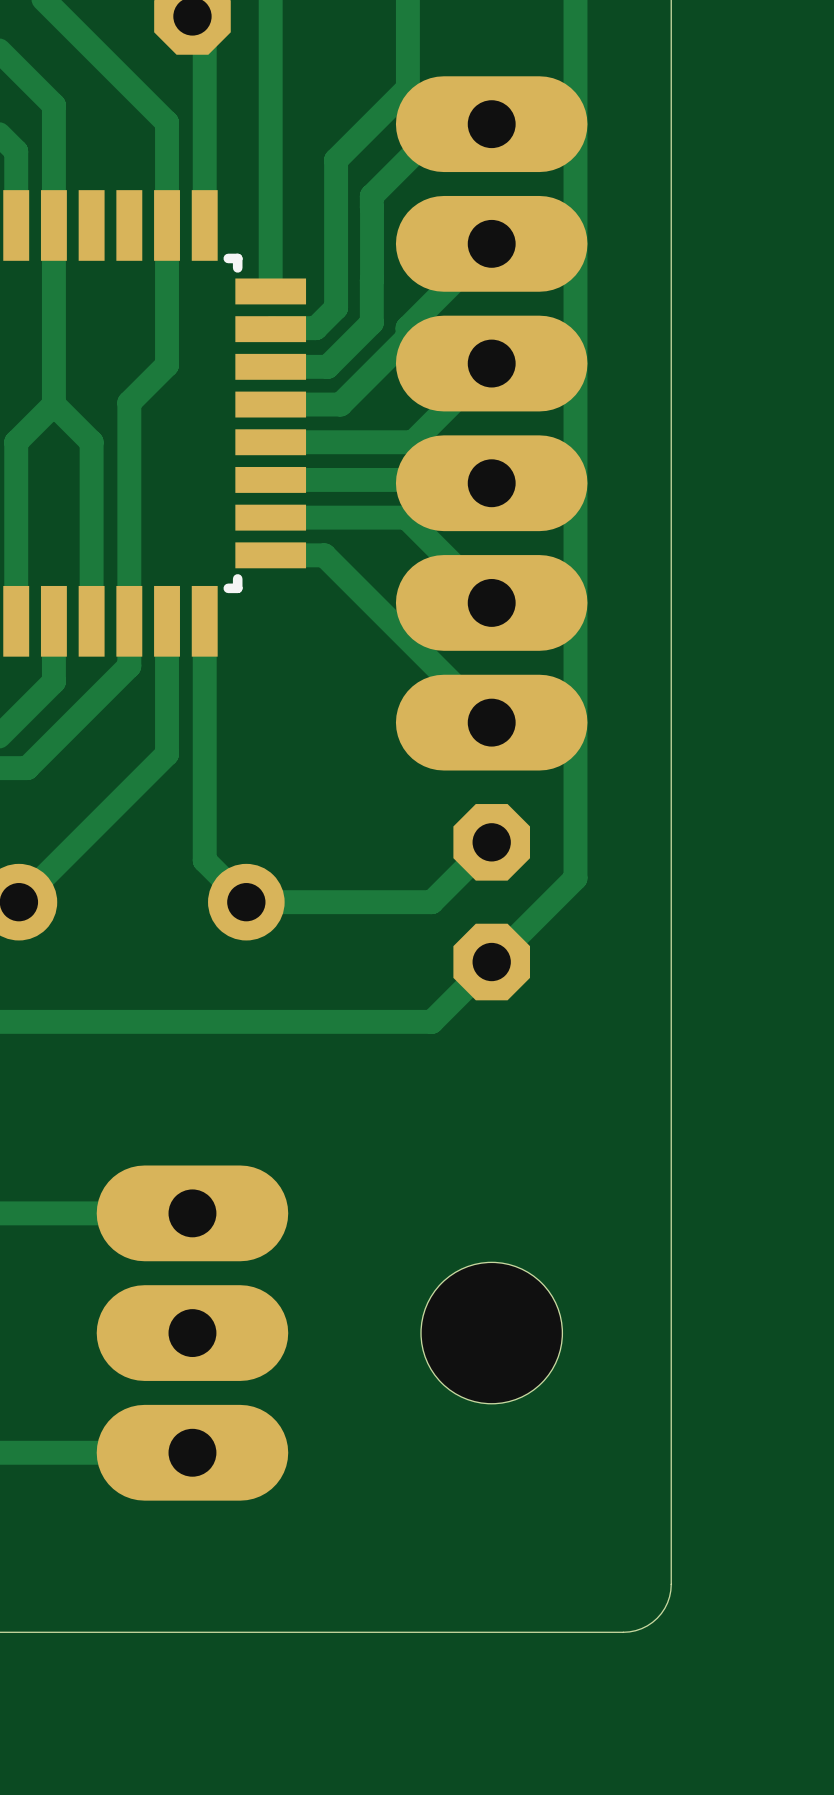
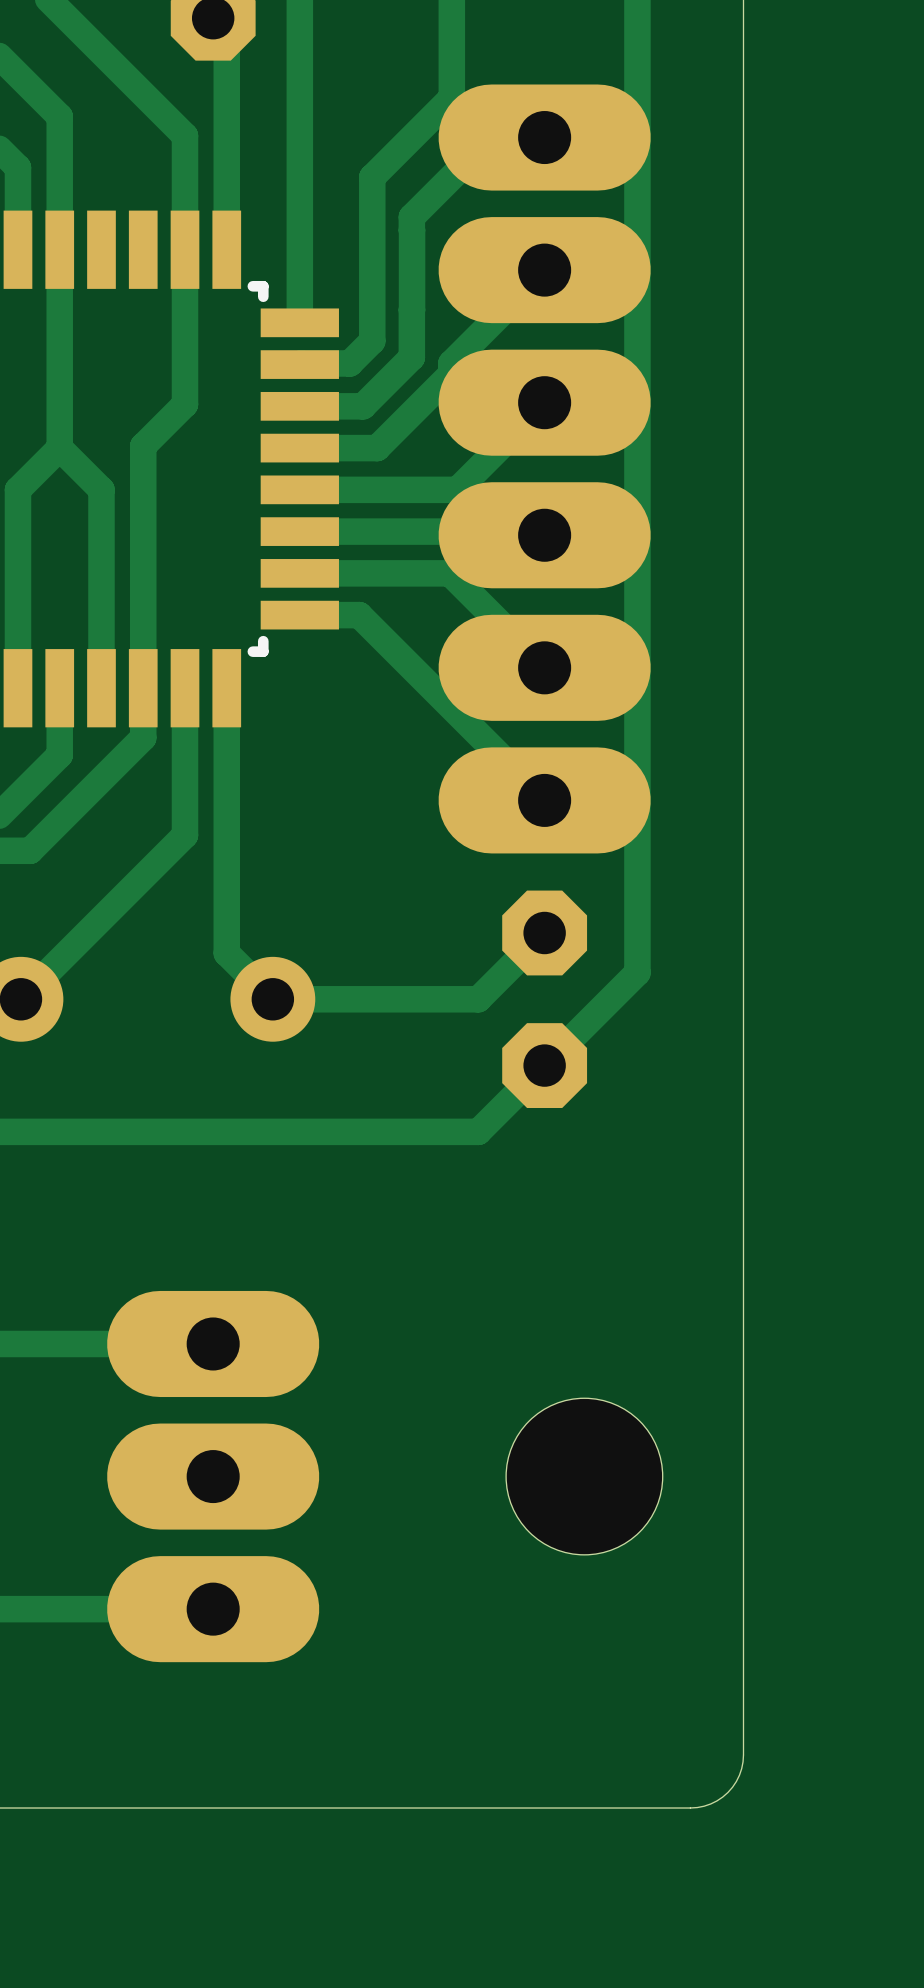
hole position: (491, 1333) -> (584, 1476)

